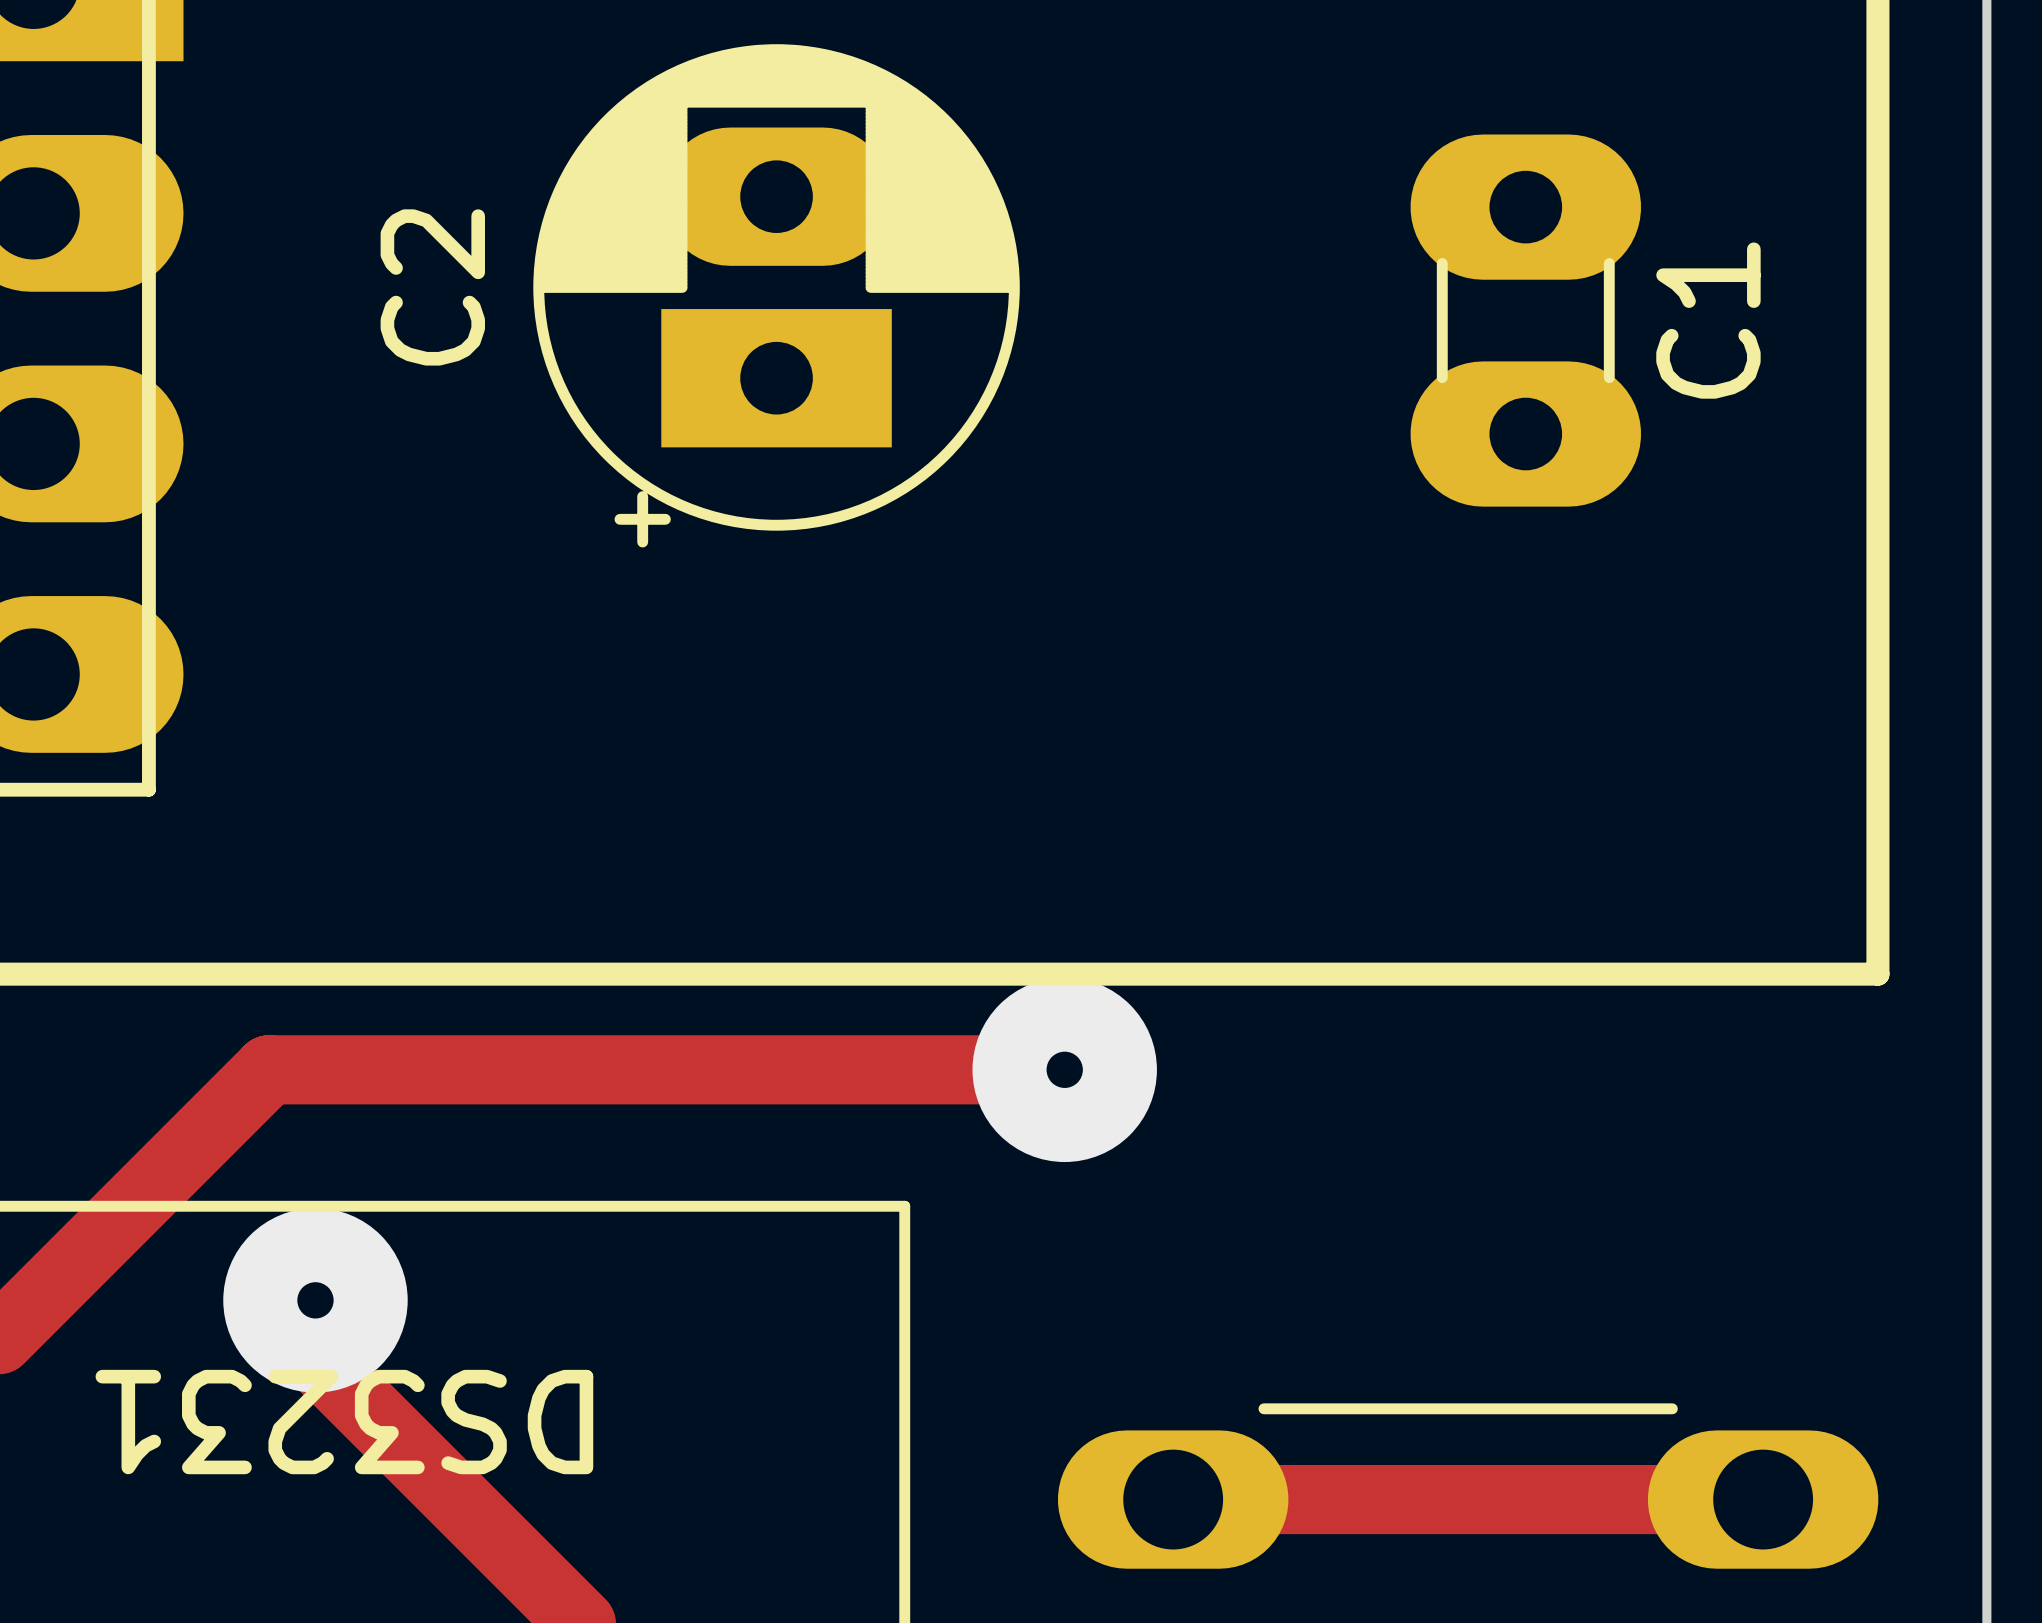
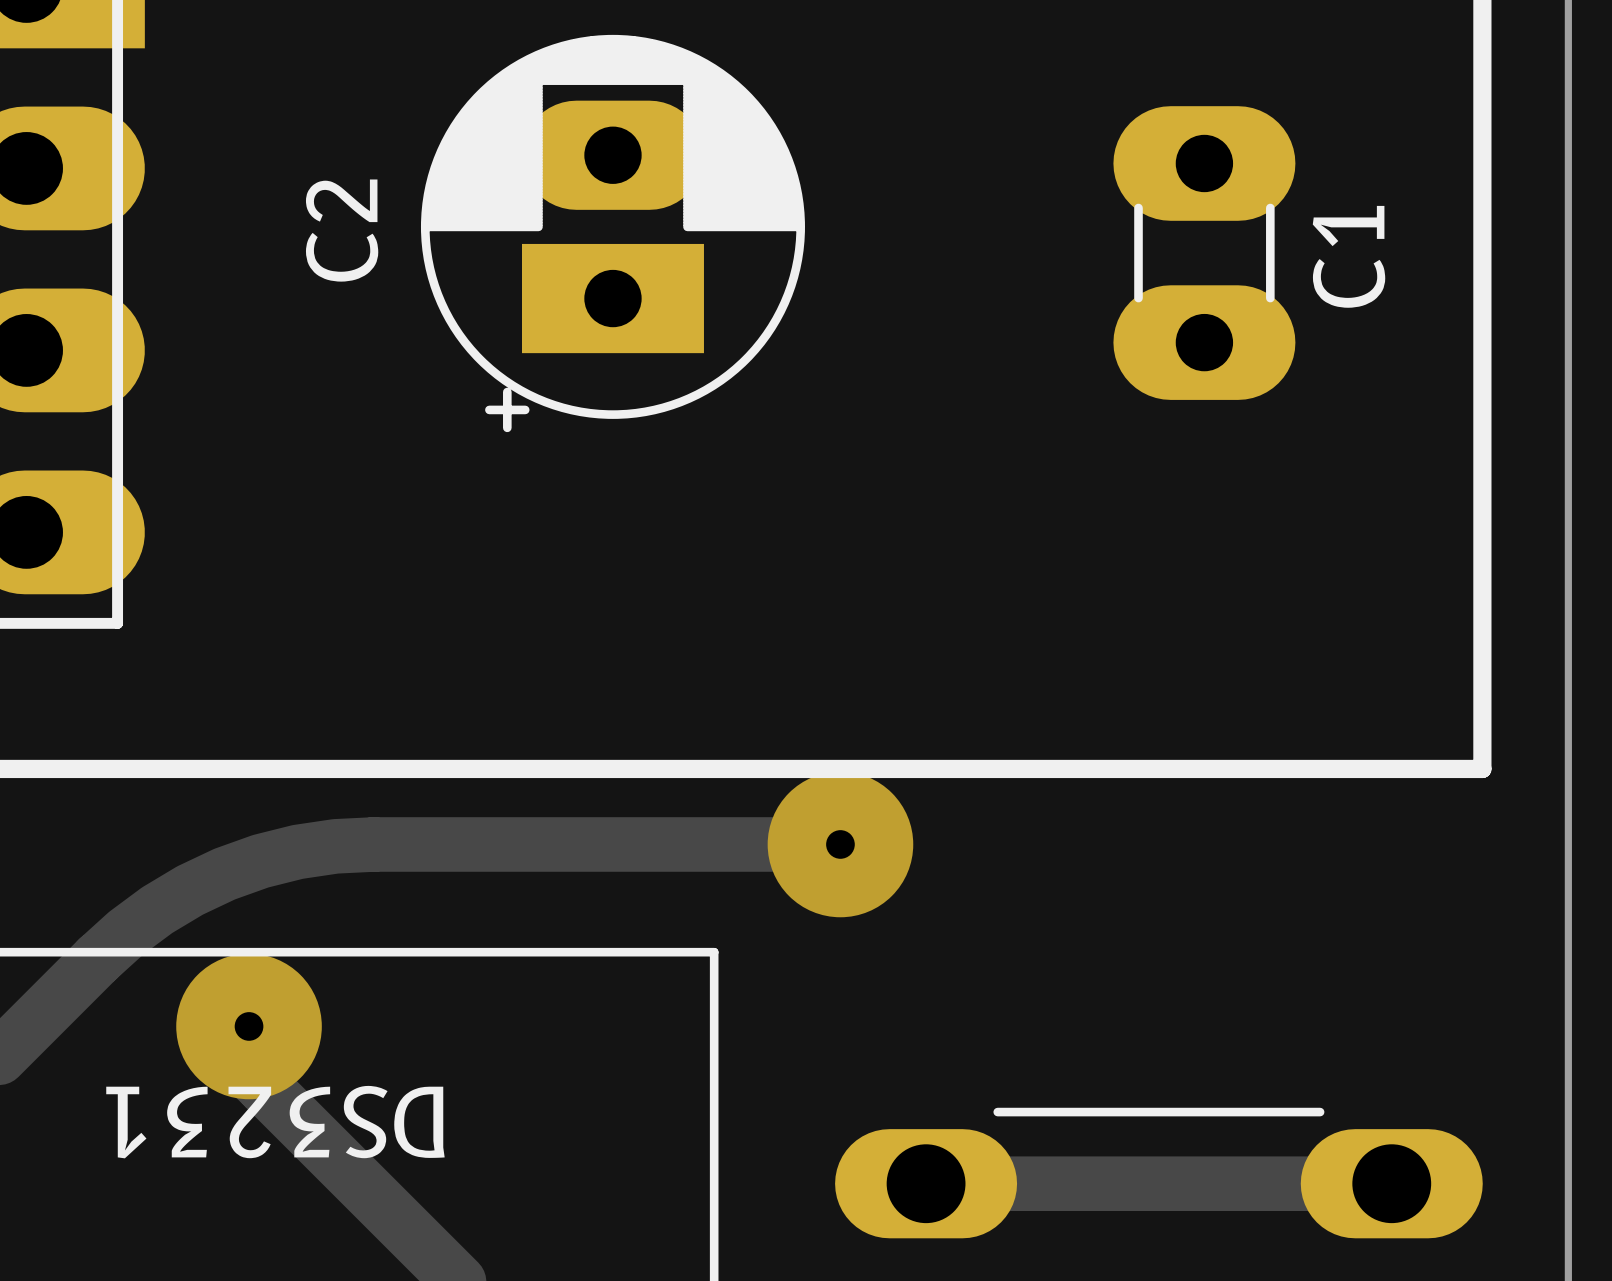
track: (473, 1069) (268, 1069) (124, 1214) -> (373, 844) (335, 846) (297, 851) (260, 861) (224, 874) (190, 890) (157, 910) (126, 932) (98, 958)

